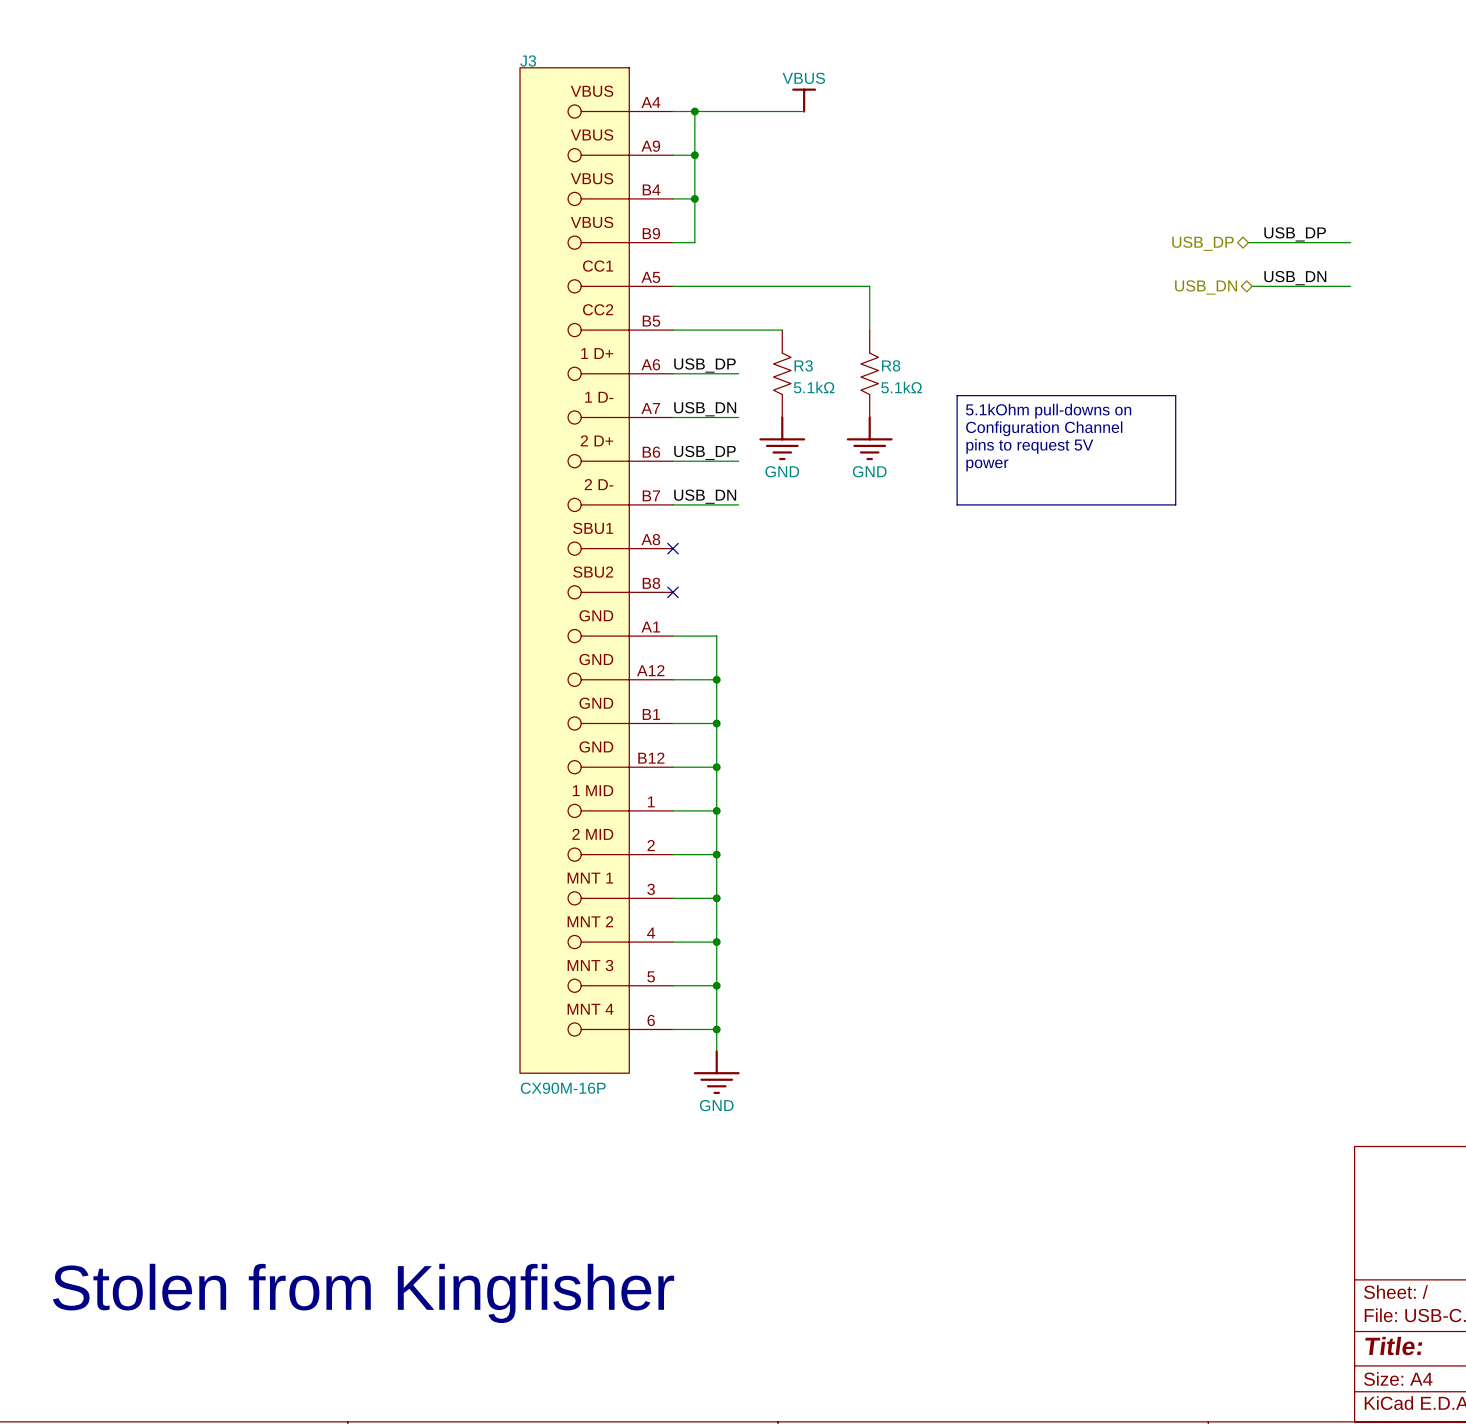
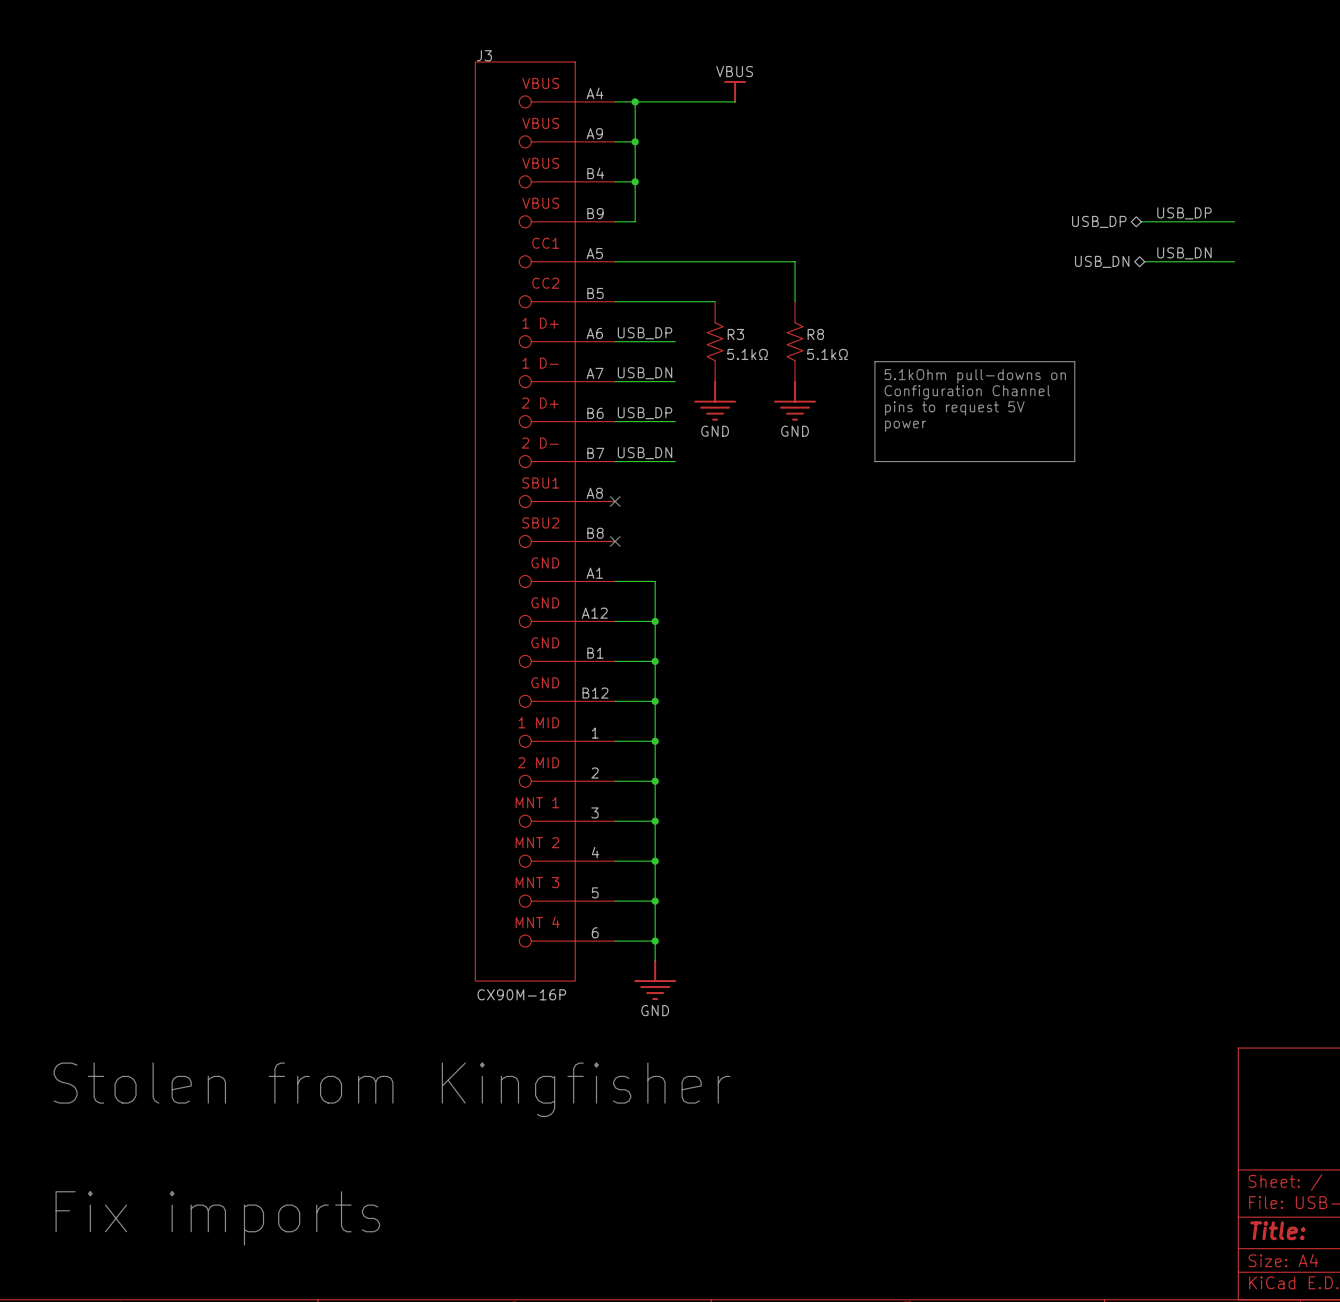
text position: Stolen from Kingfisher (363, 1293) -> Stolen from Kingfisher (391, 1089)
text: none -> Fix imports (217, 1218)

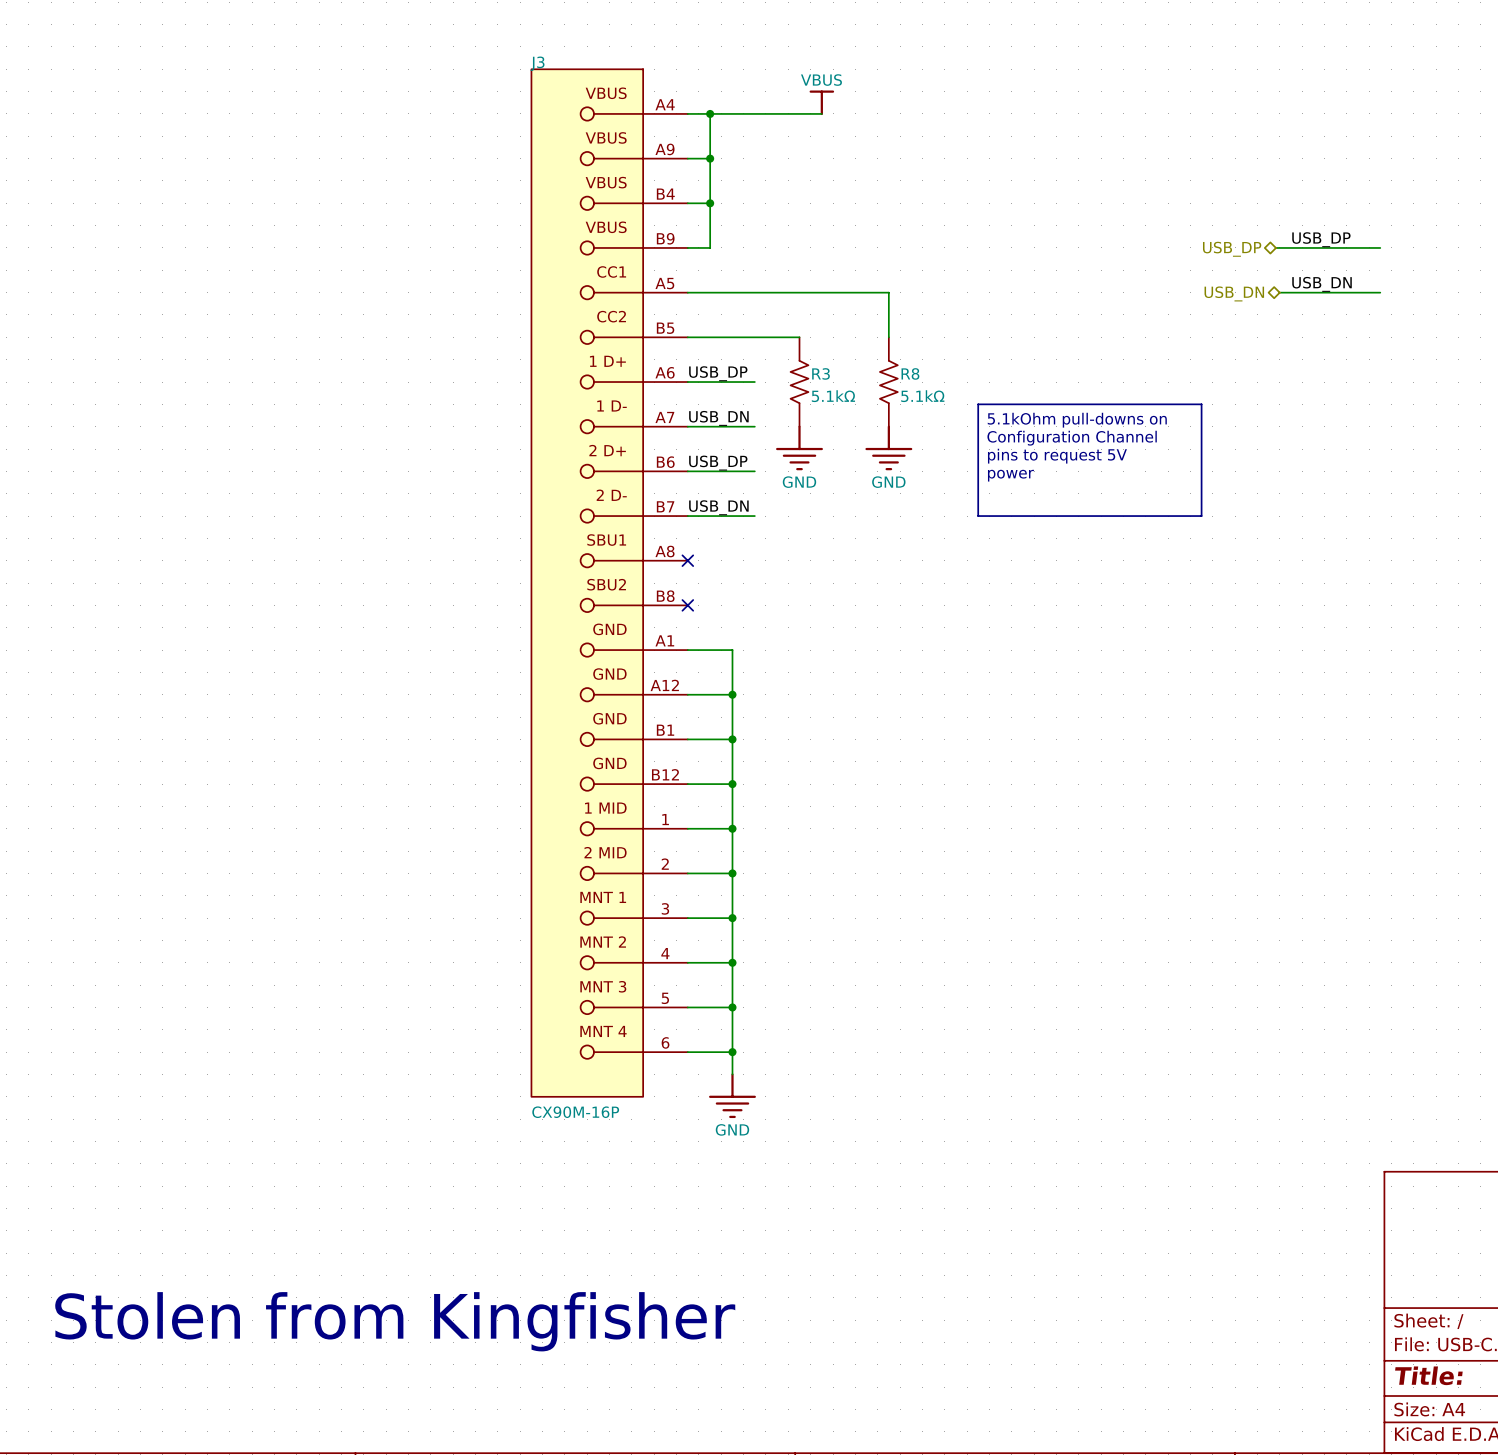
text position: Stolen from Kingfisher (391, 1089) -> Stolen from Kingfisher (395, 1321)
text: Fix imports (217, 1218) -> none

